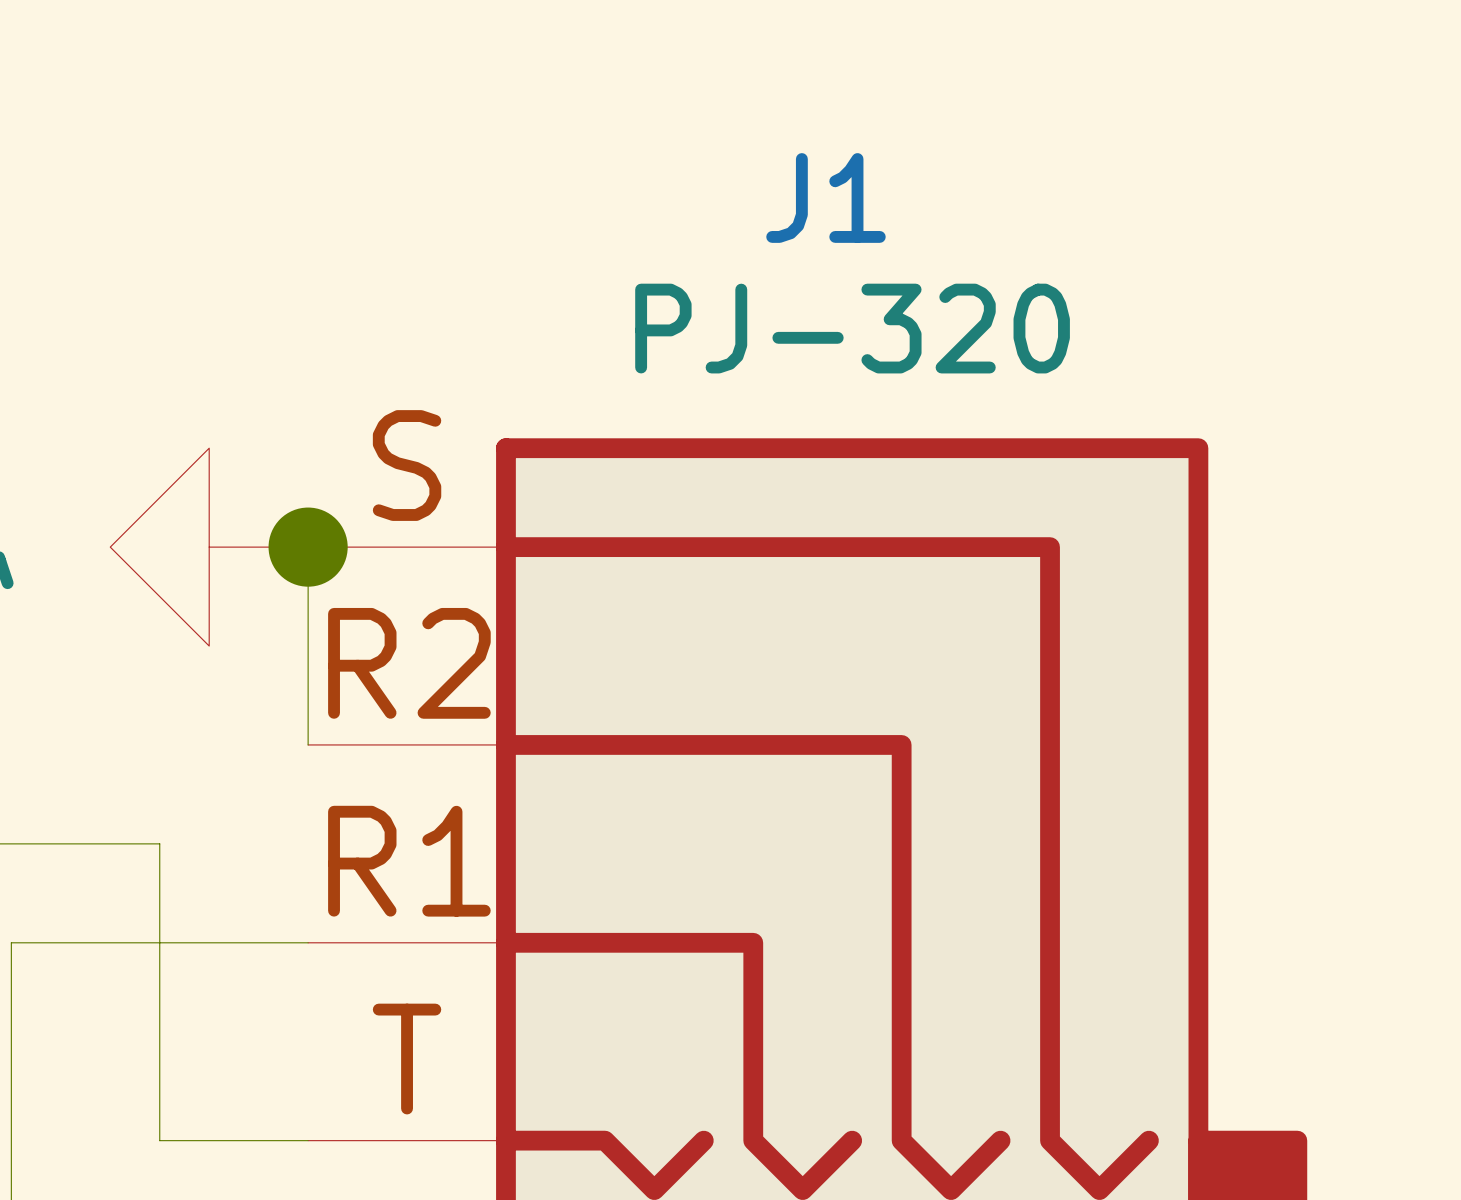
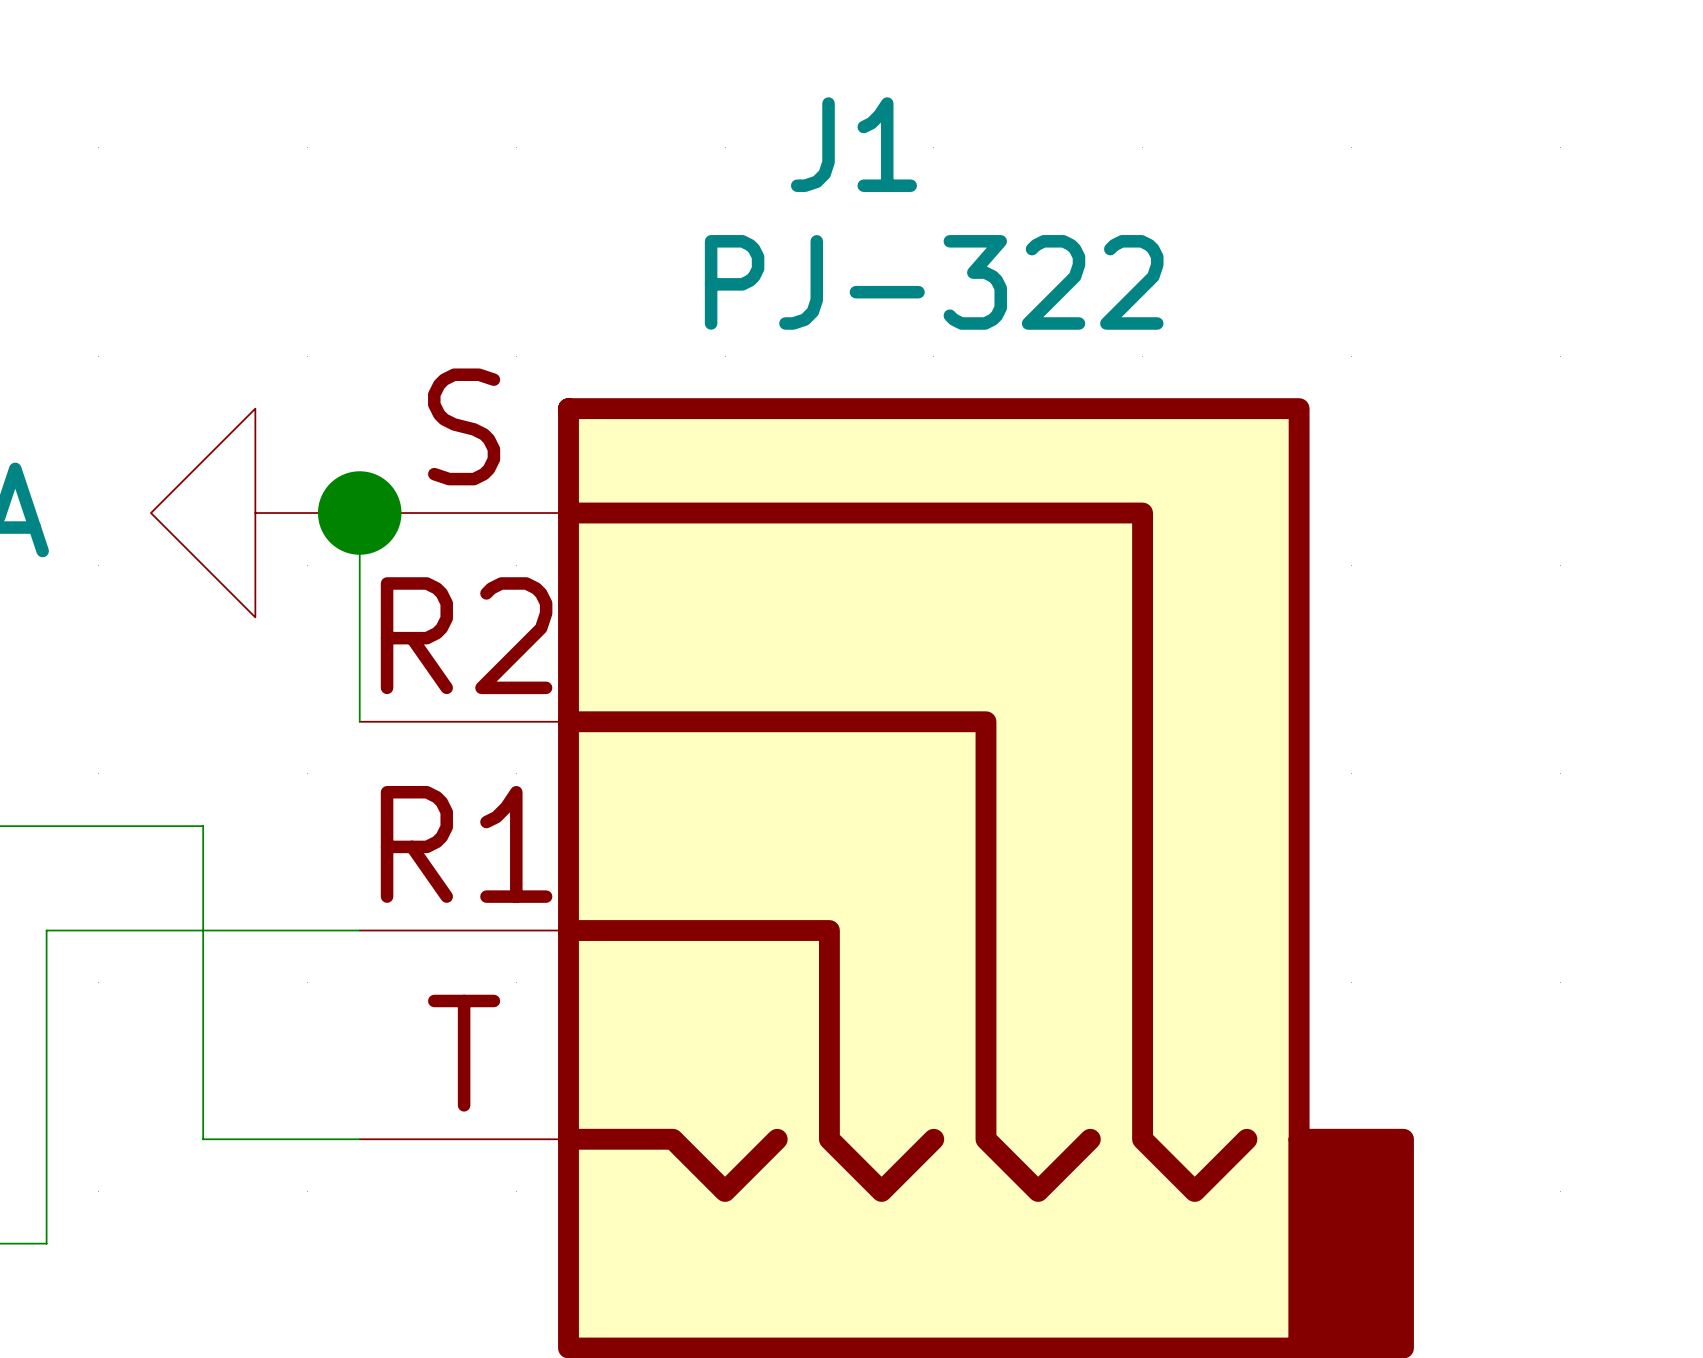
J1 name position: J1 (825, 197) -> J1 (853, 144)
J1 value: PJ-320 (852, 328) -> PJ-322 (934, 282)

